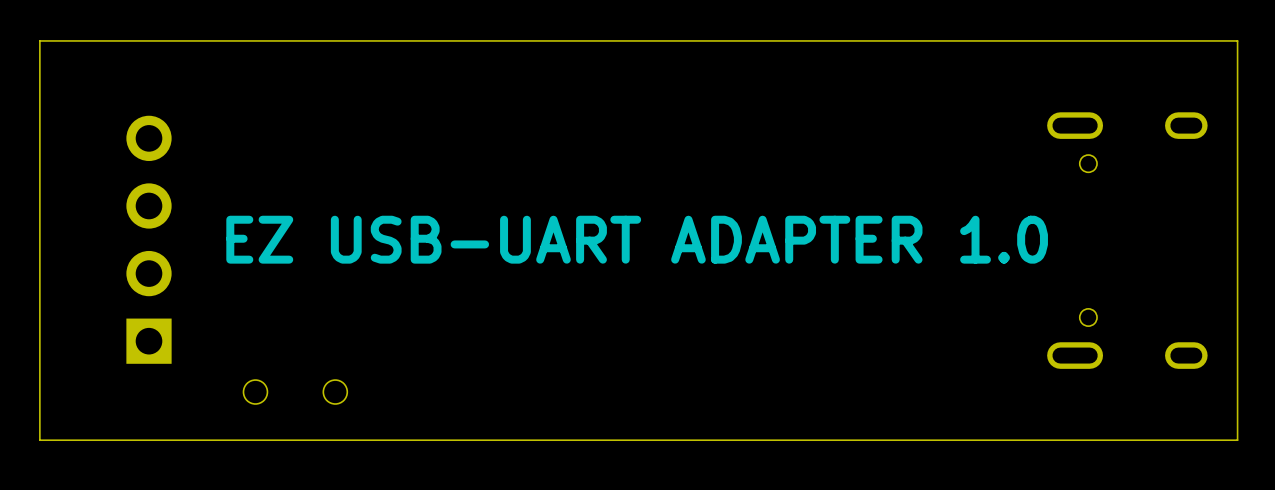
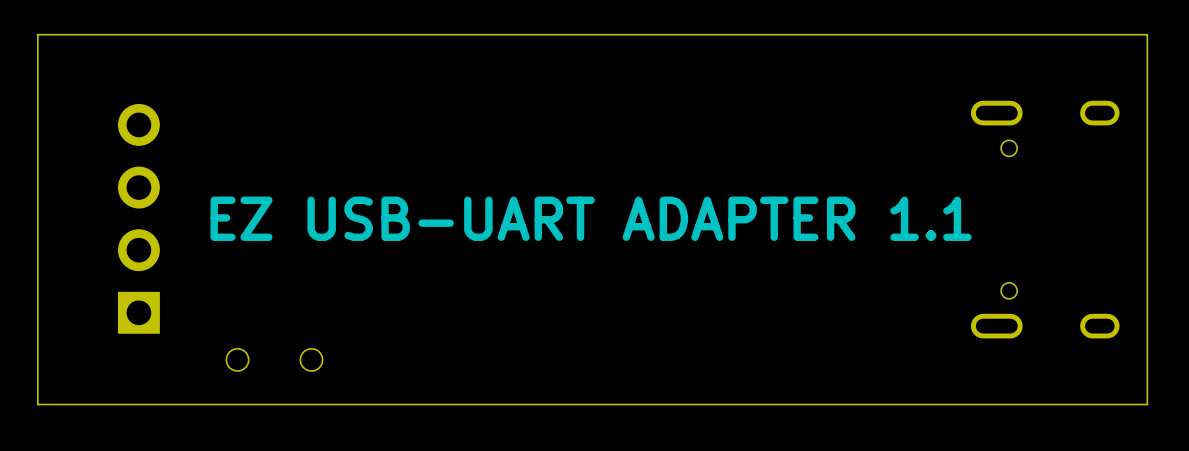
text: EZ USB-UART ADAPTER 1.0 (637, 239) -> EZ USB-UART ADAPTER 1.1 (591, 218)

